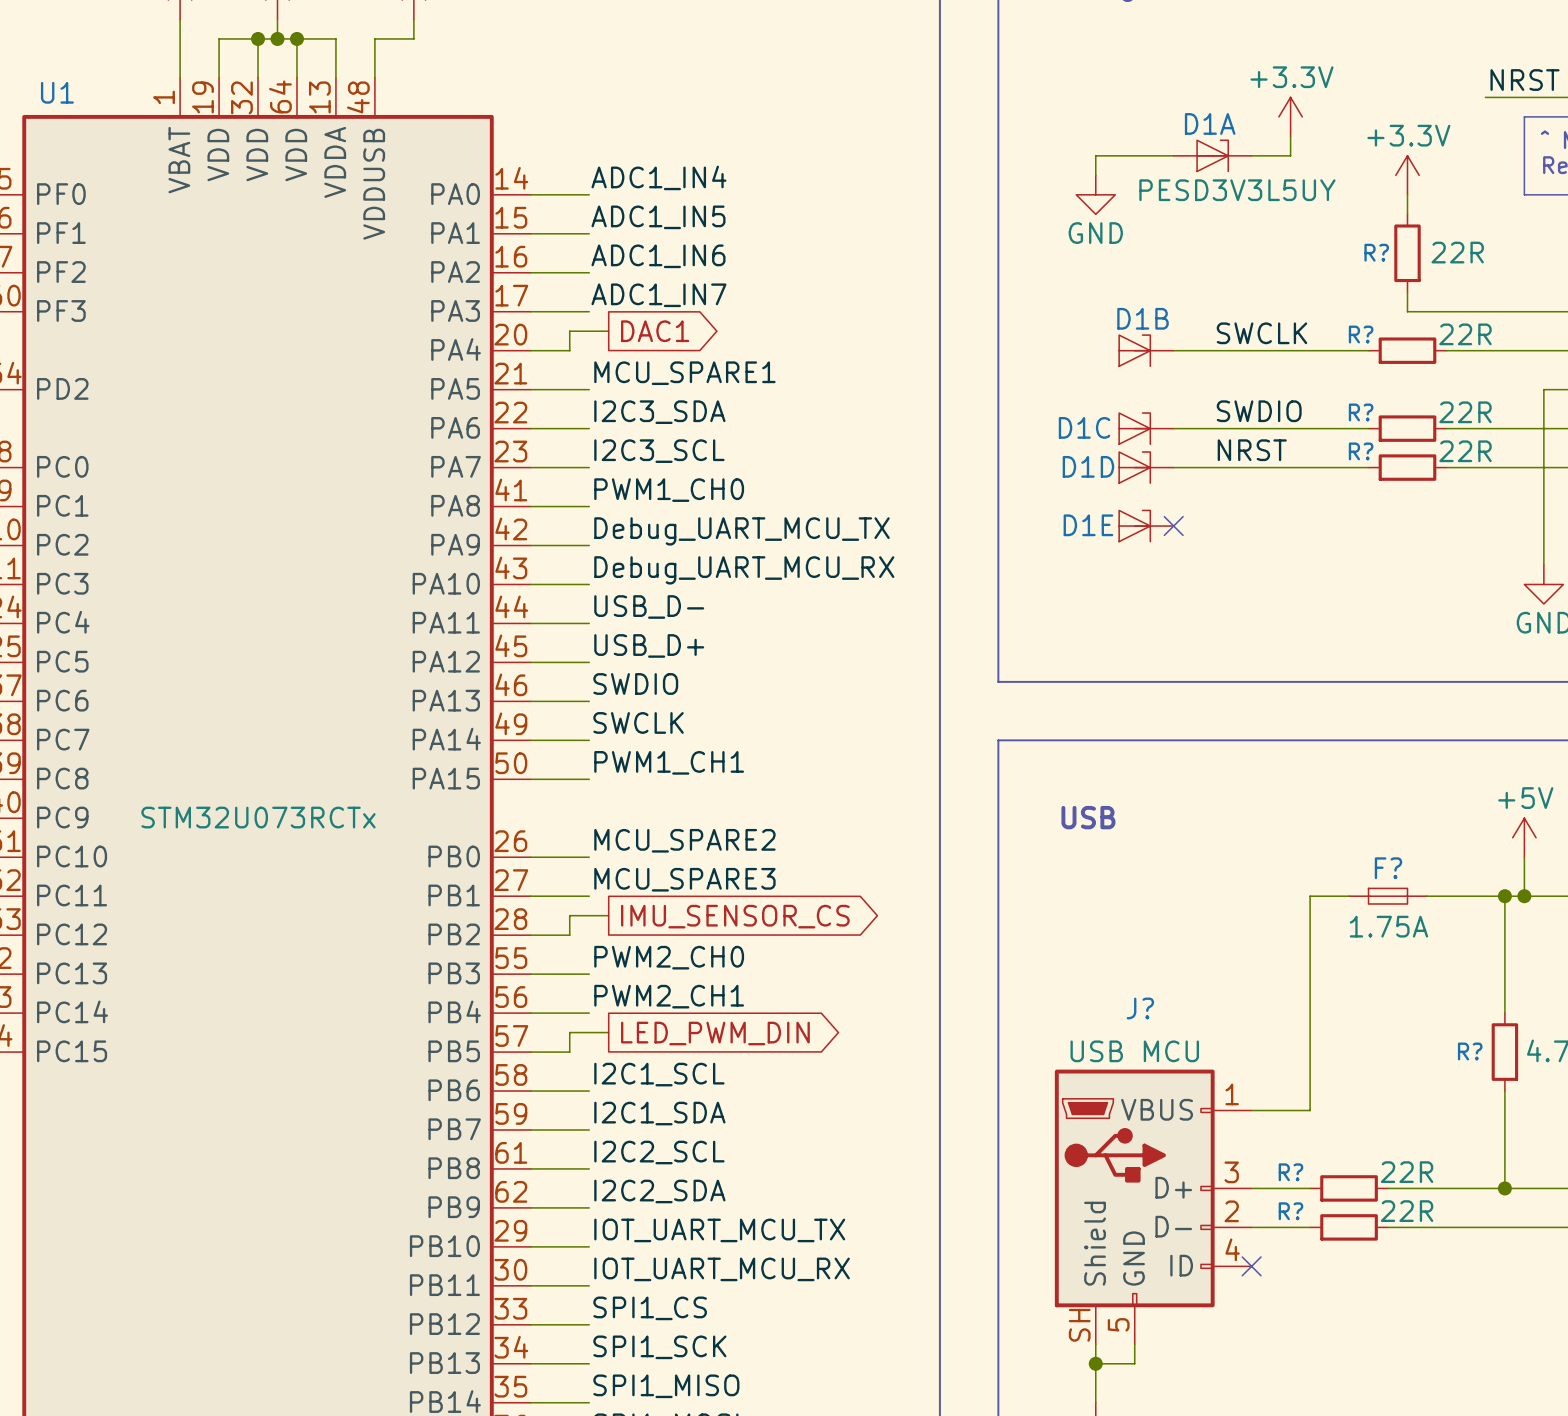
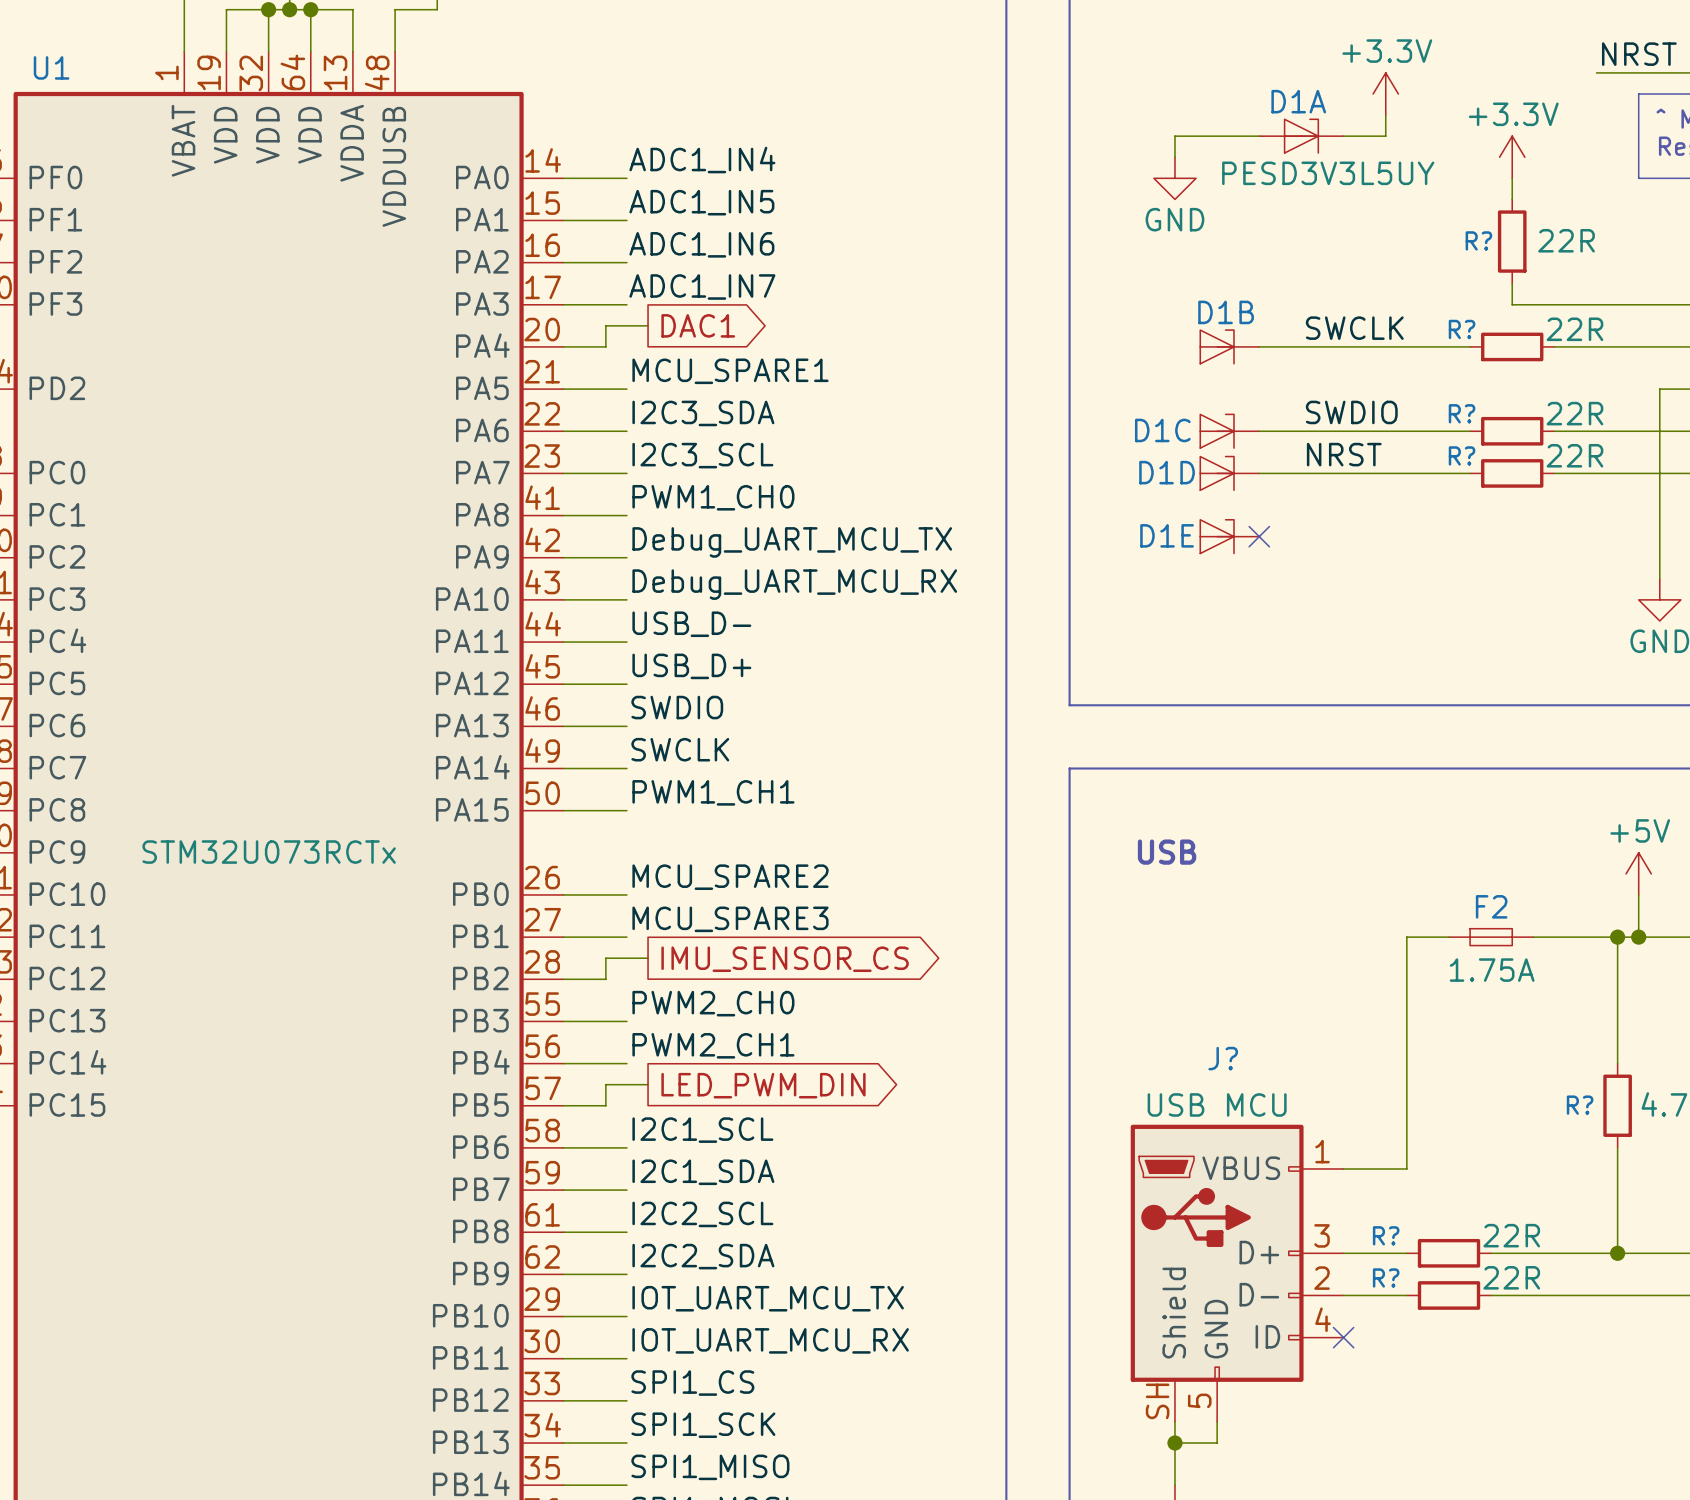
F? name: F? (1388, 868) -> F2 (1491, 906)

